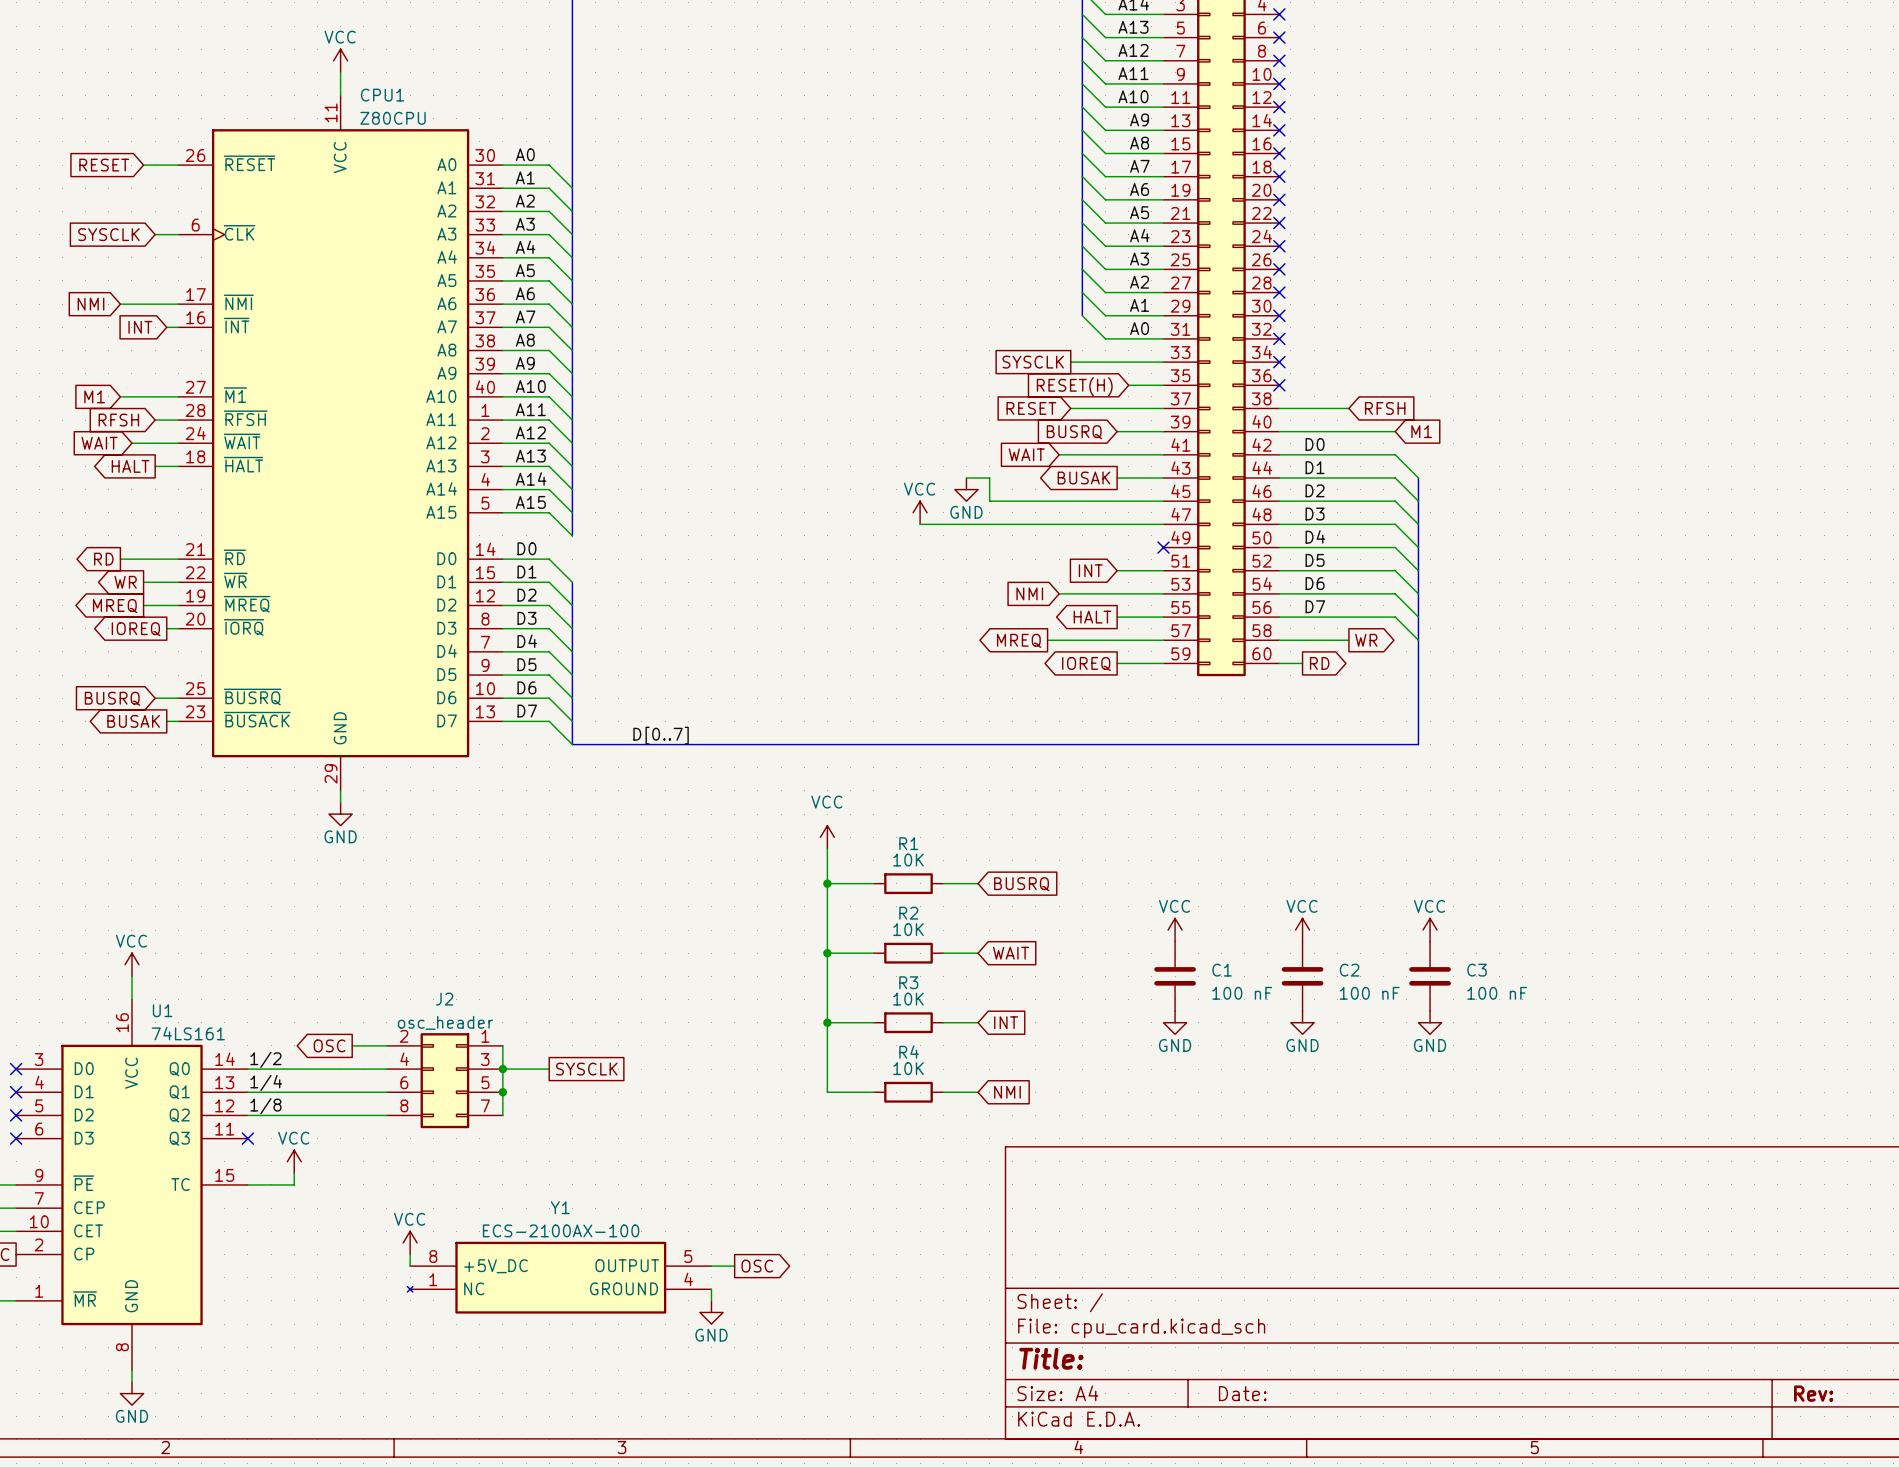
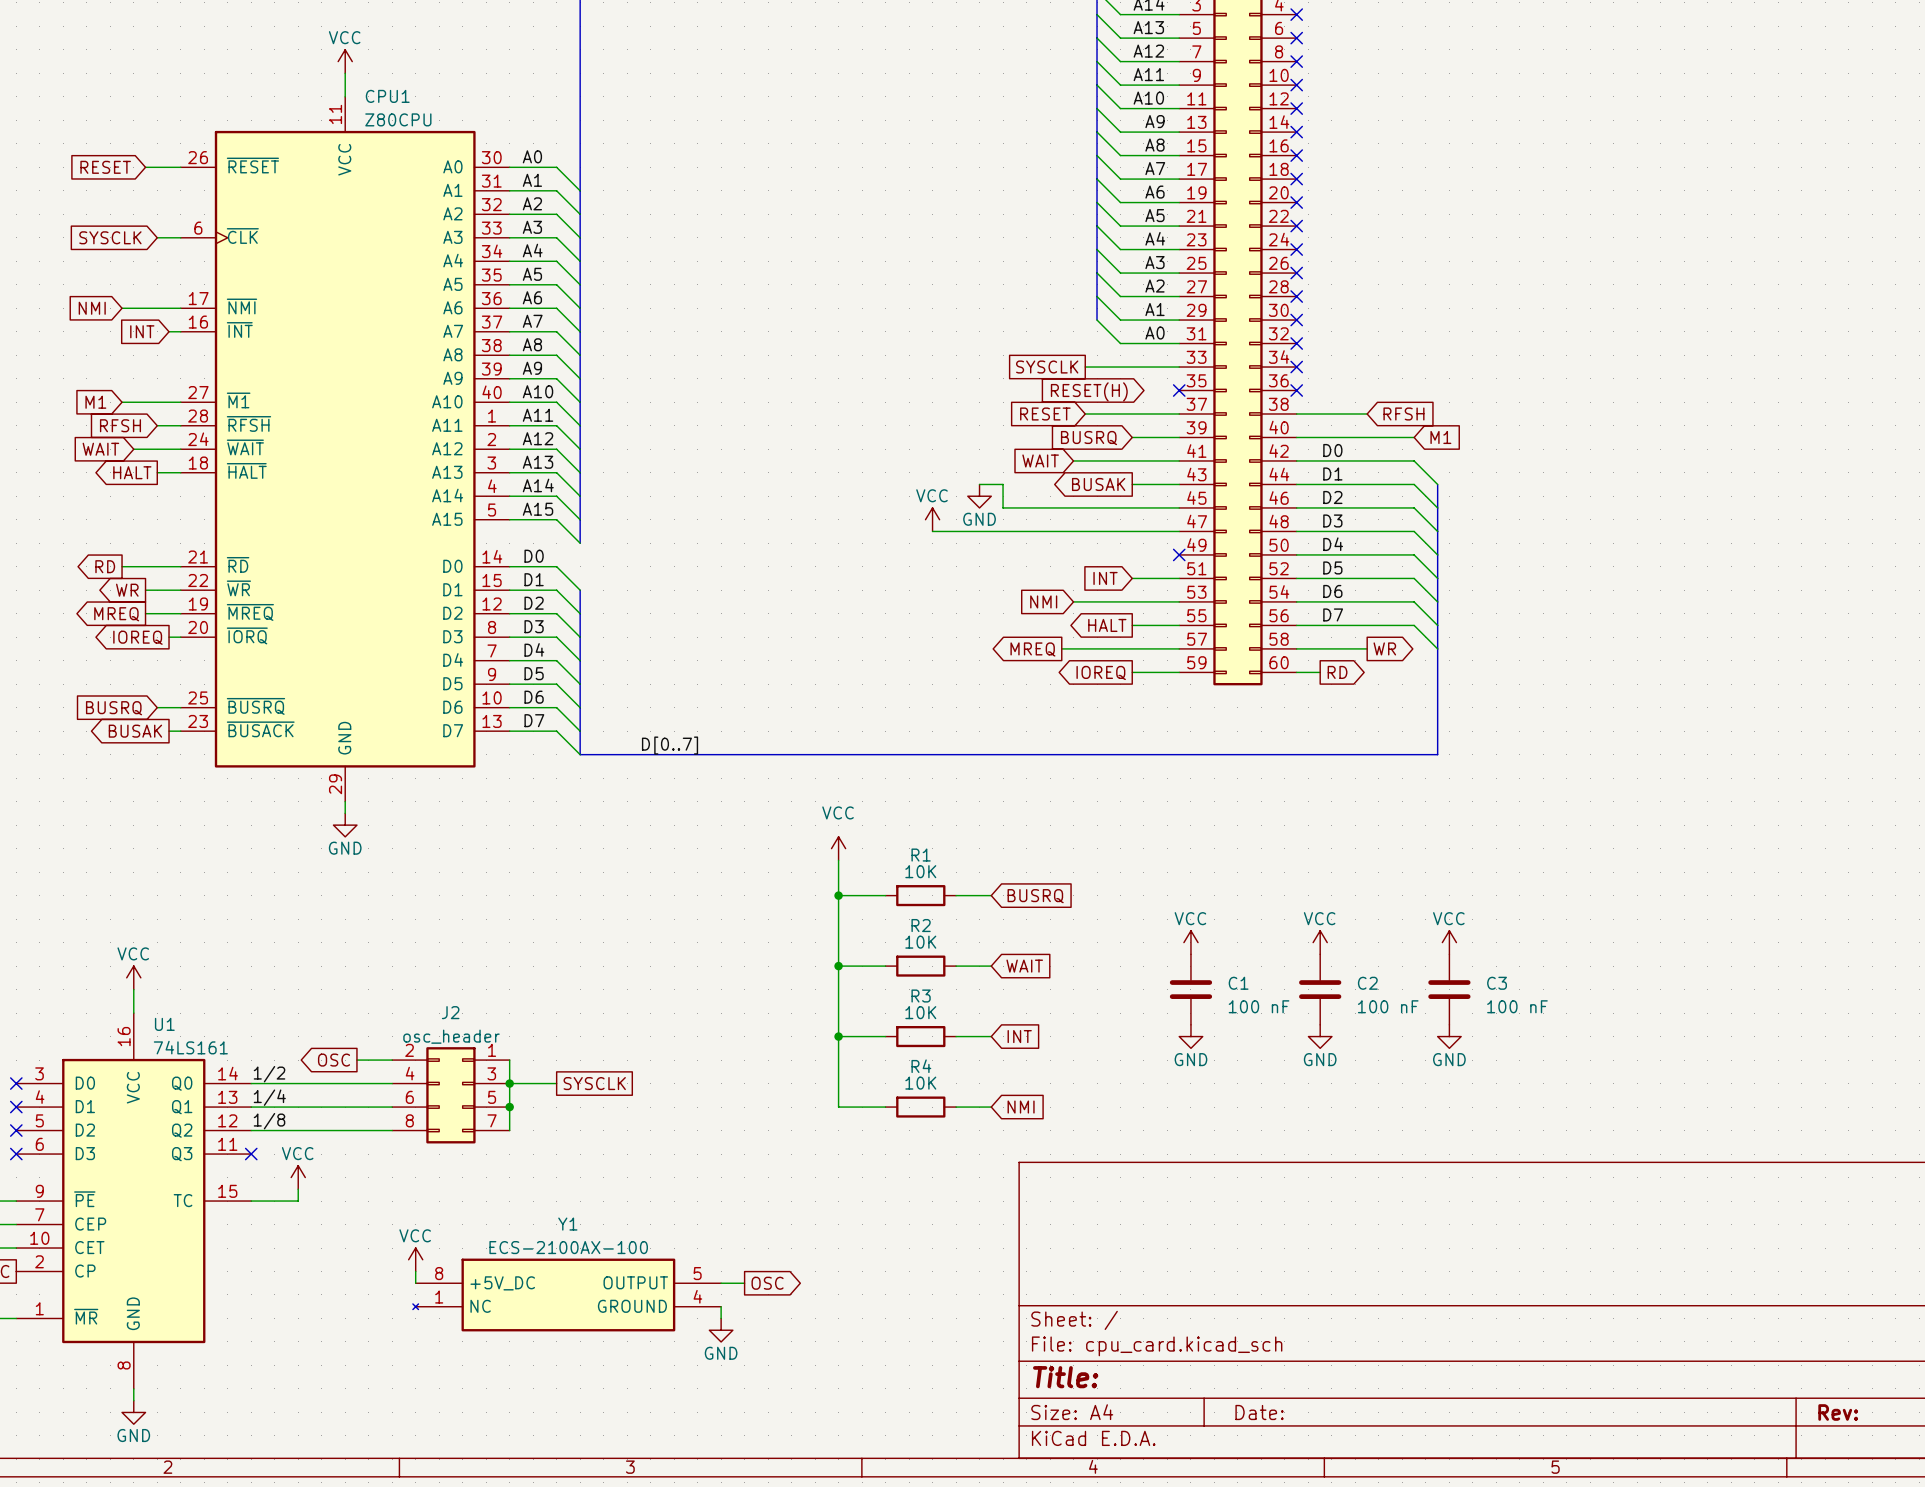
wire: (1128, 385) (1163, 385) -> none
no-connect mark: none -> (1179, 390)

